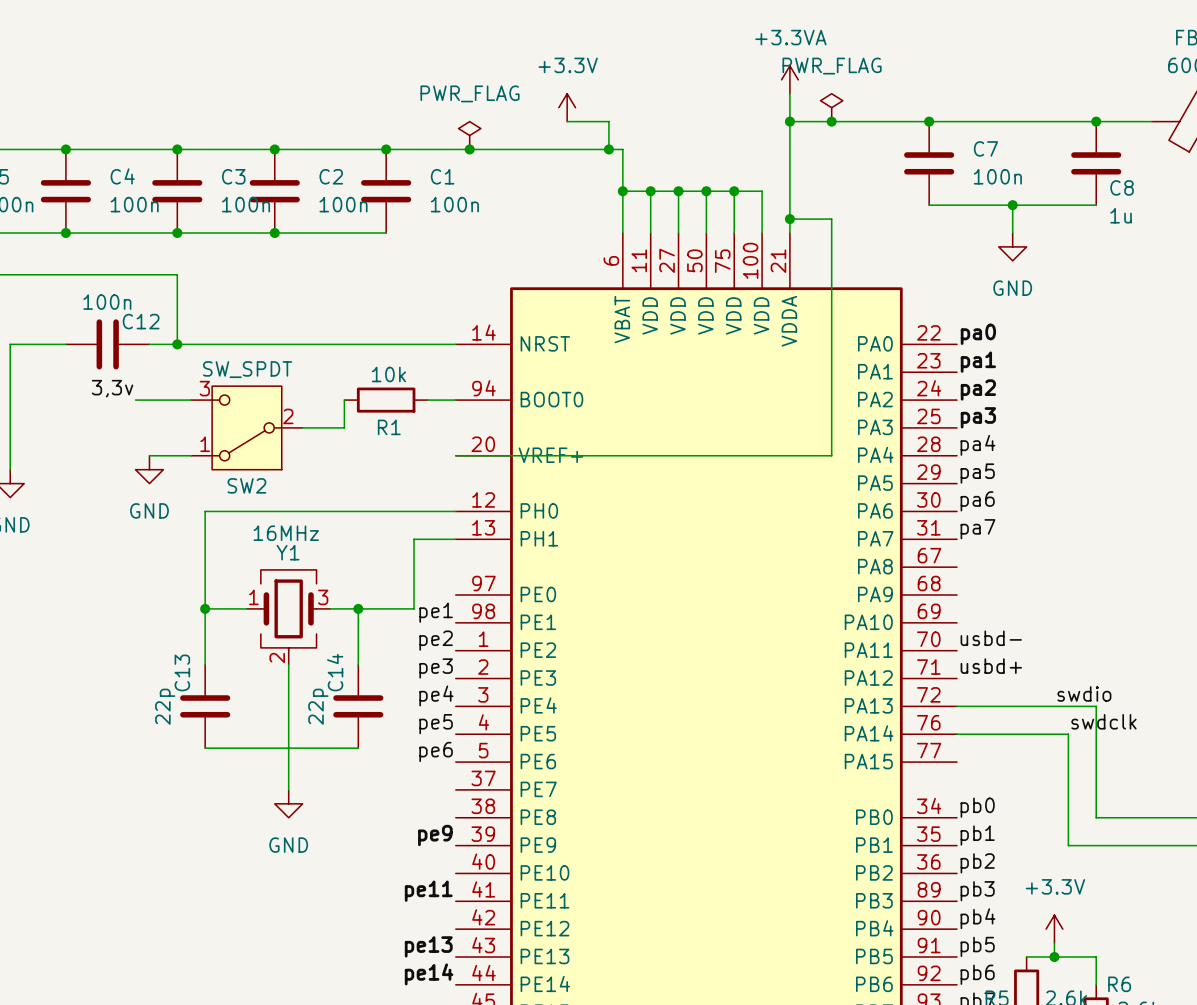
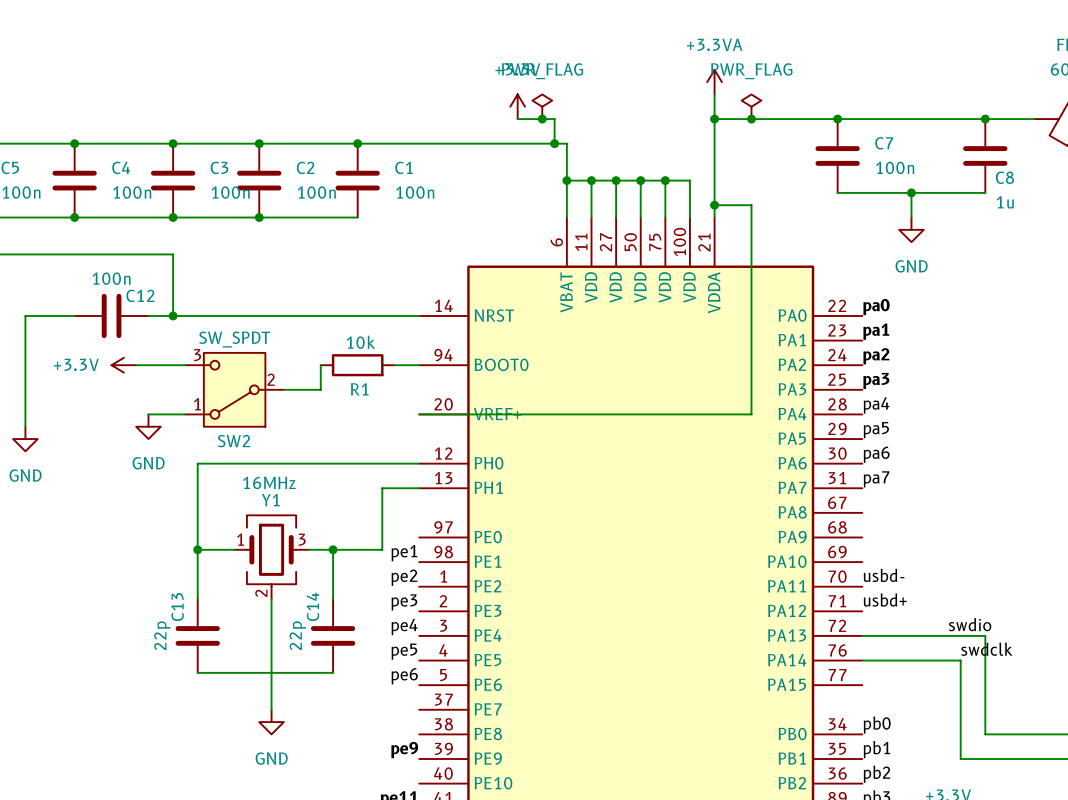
junction: none -> (542, 119)
power symbol position: PWR_FLAG (469, 135) -> PWR_FLAG (542, 106)
junction: (469, 149) -> none
label: 3,3v (112, 388) -> none
power symbol: none -> +3.3V (123, 365)

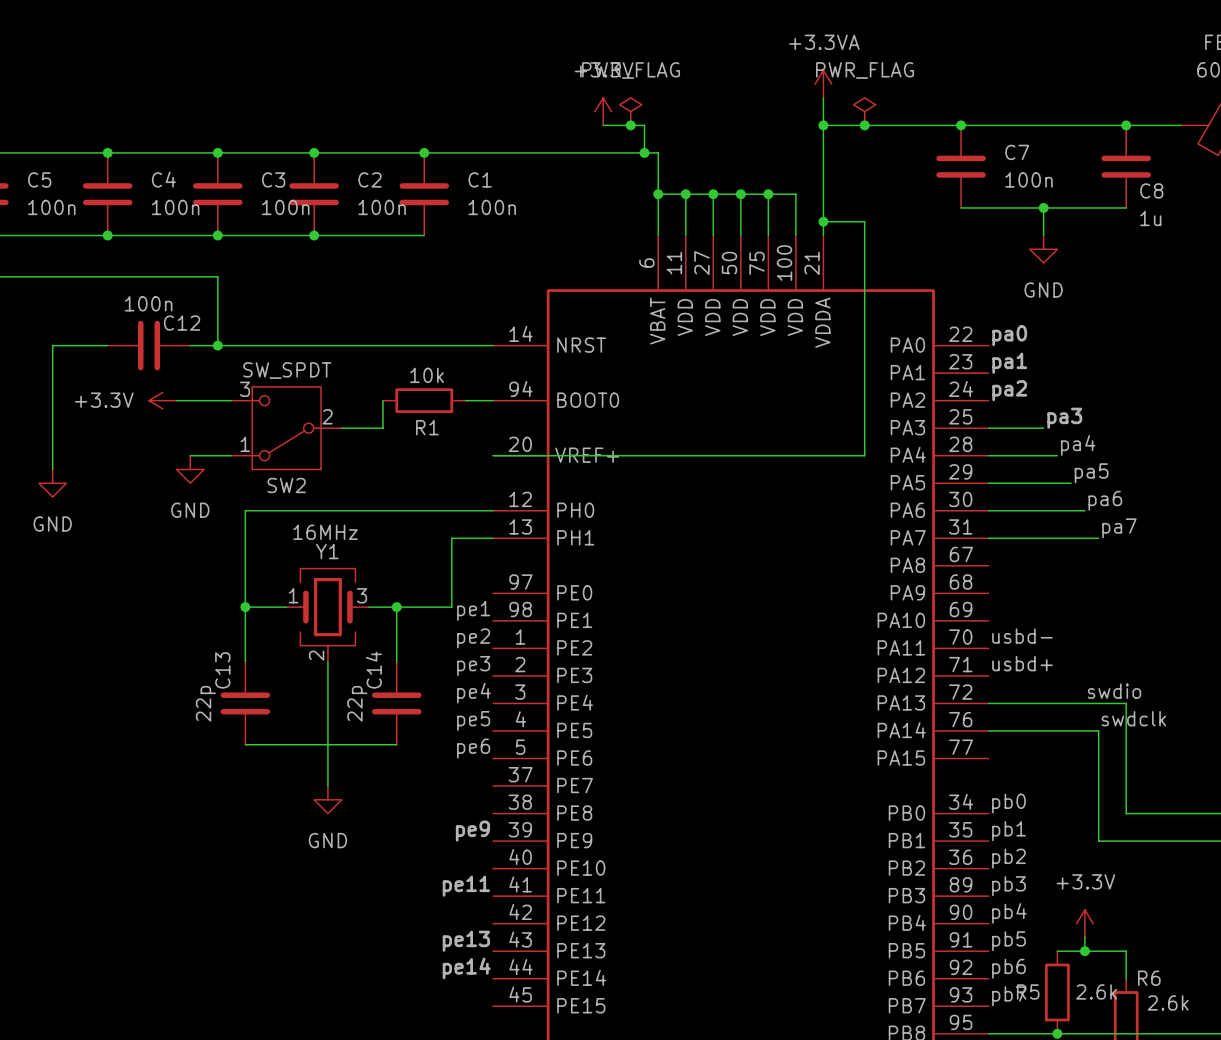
label position: pa3 (876, 380) -> pa3 (1064, 418)
wire: none -> (988, 428) (1043, 428)
label position: pa4 (876, 405) -> pa4 (1078, 445)
wire: none -> (988, 455) (1057, 455)
label position: pa5 (876, 430) -> pa5 (1091, 473)
wire: none -> (988, 483) (1071, 483)
label position: pa6 (876, 454) -> pa6 (1105, 500)
wire: none -> (988, 510) (1084, 510)
label position: pa7 (876, 479) -> pa7 (1119, 528)
wire: none -> (988, 538) (1098, 538)

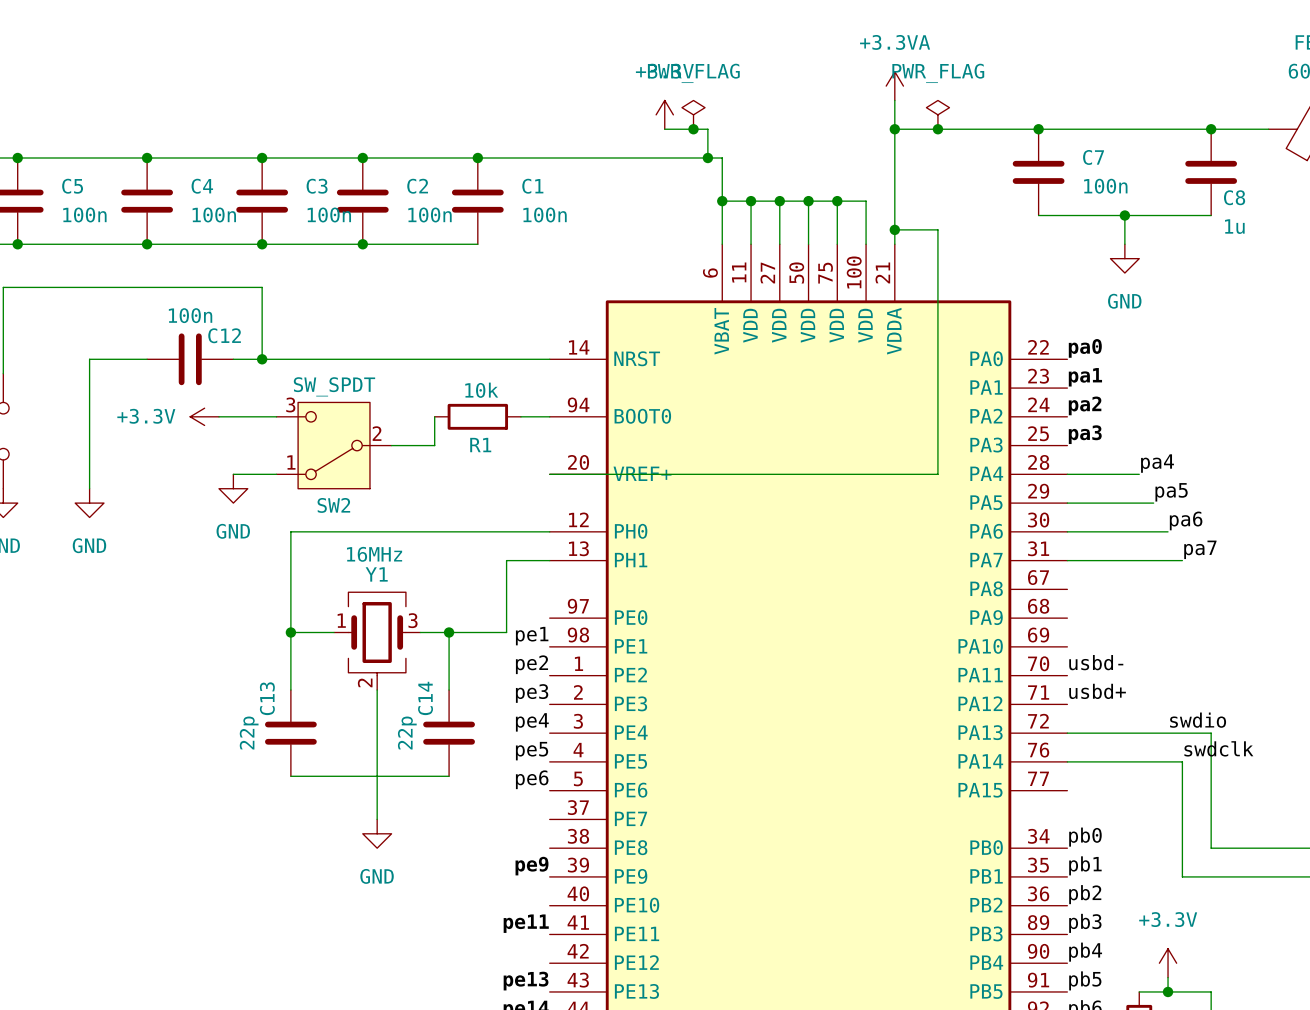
label position: pa3 (1064, 418) -> pa3 (1085, 434)
wire: (988, 428) (1043, 428) -> none

